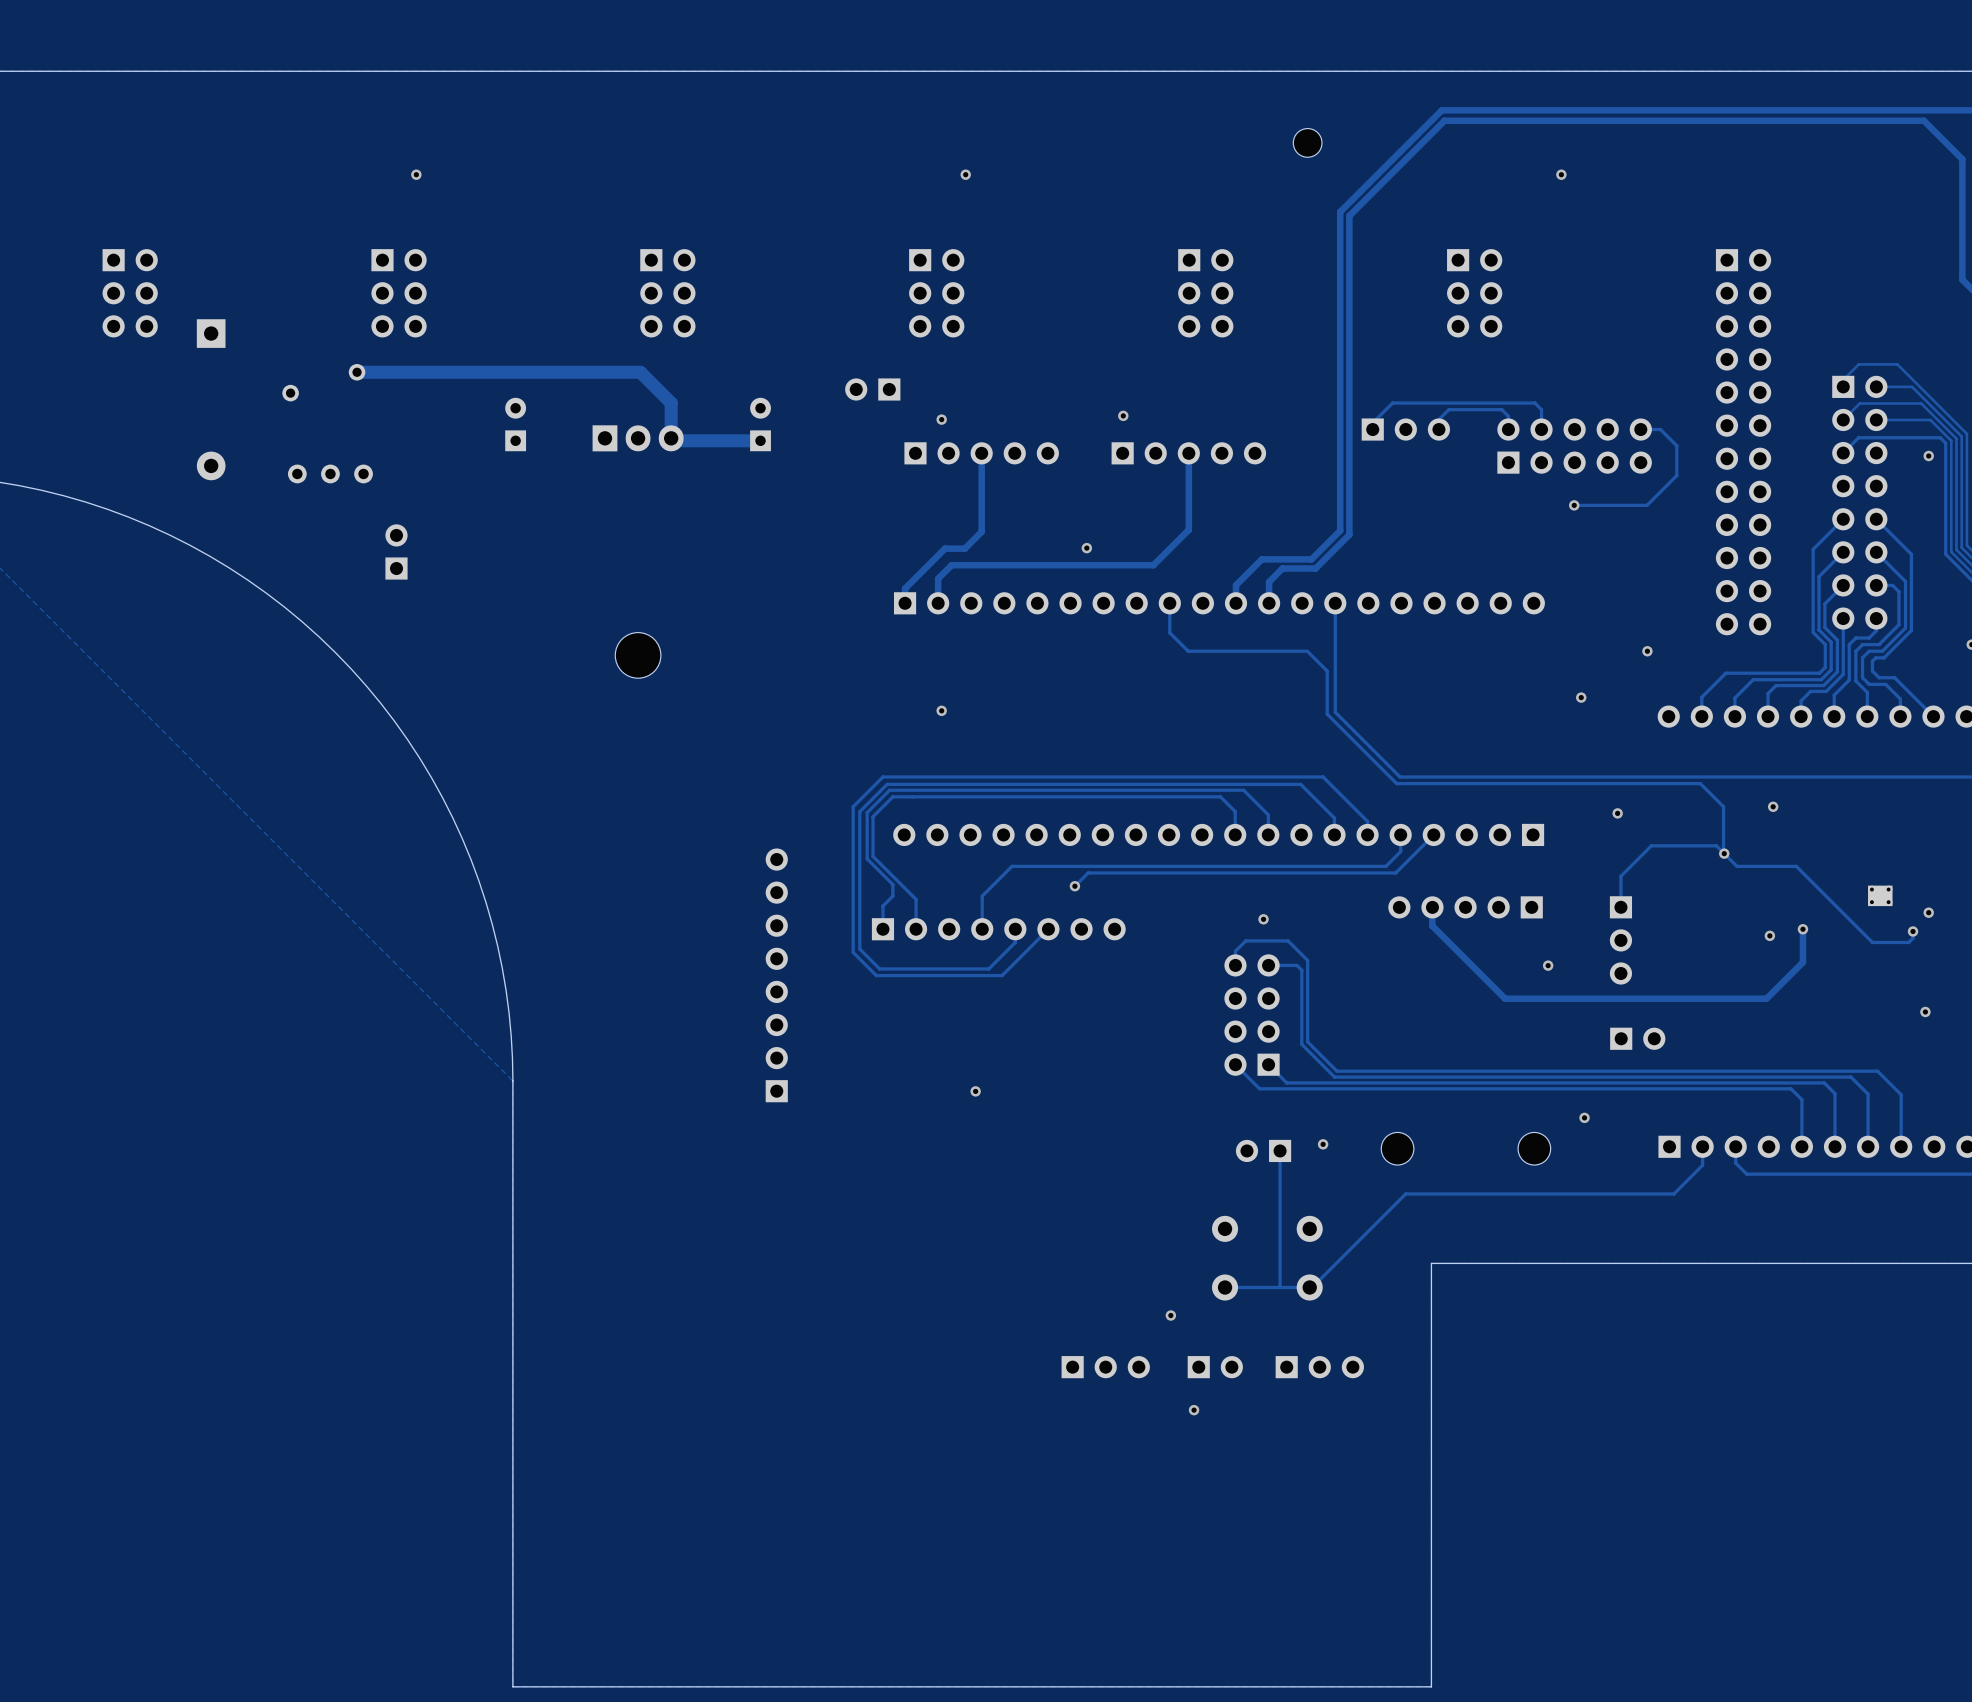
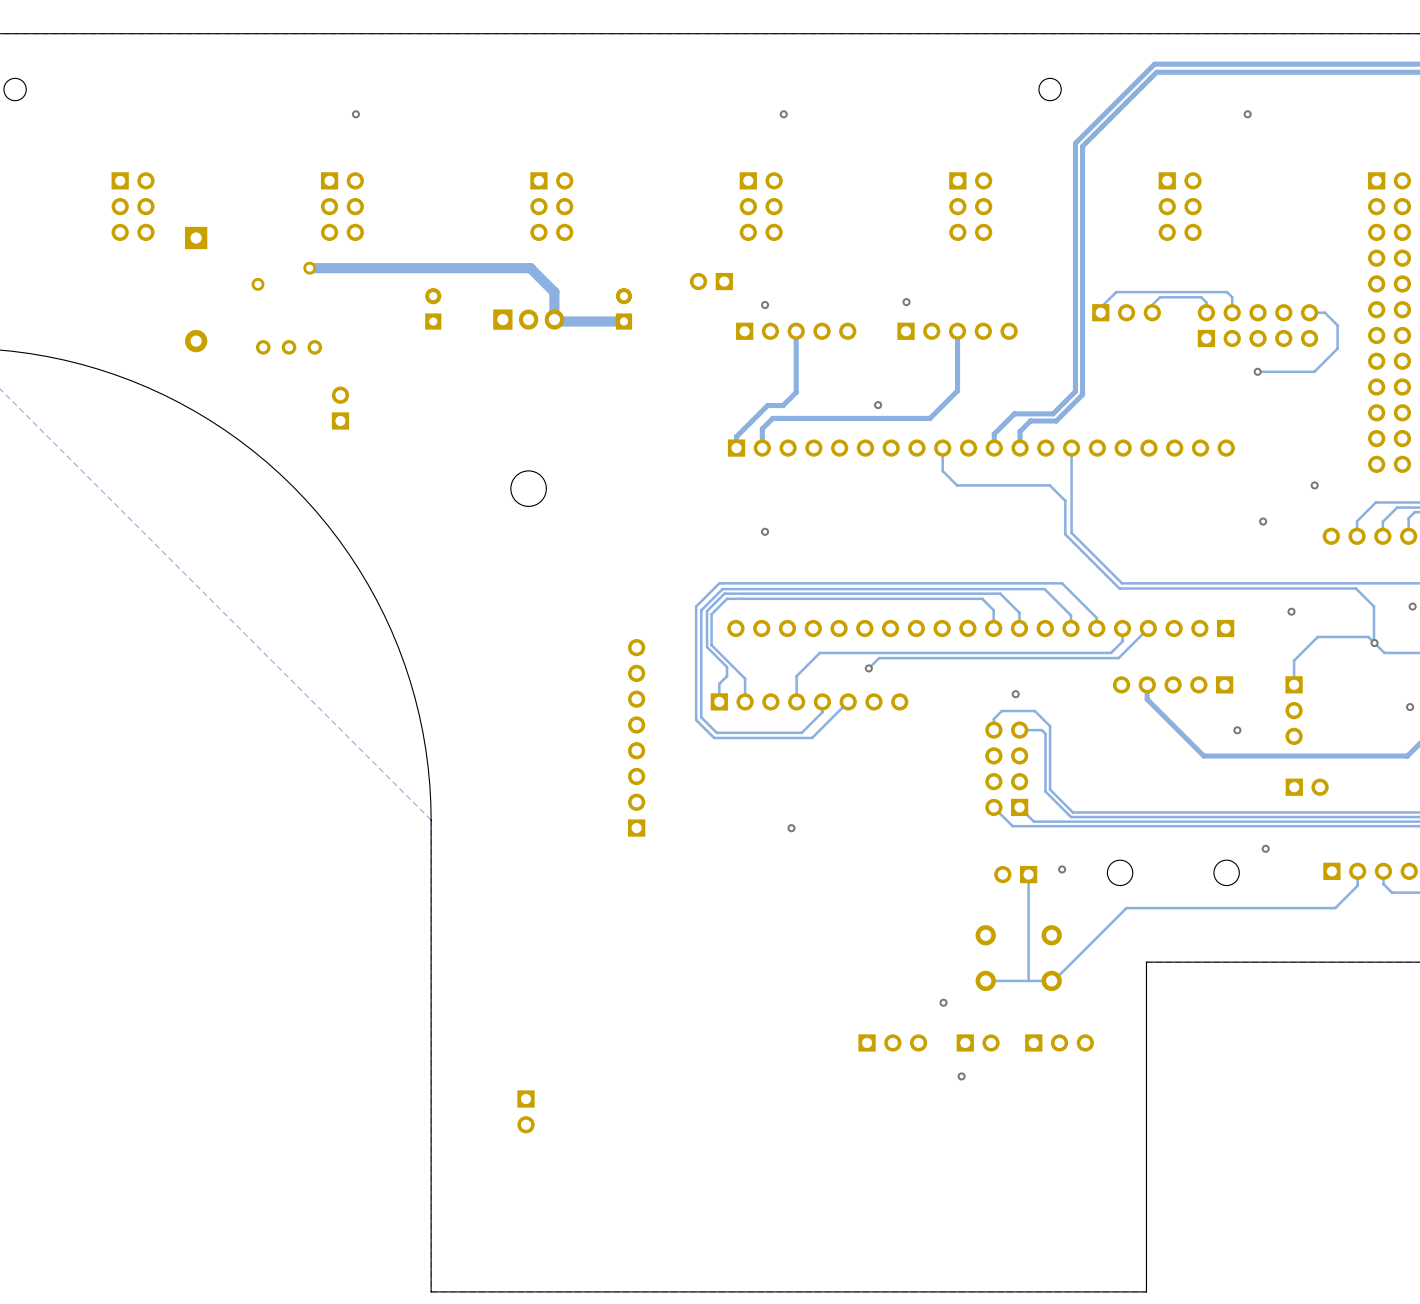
part: none -> (526, 1111)

